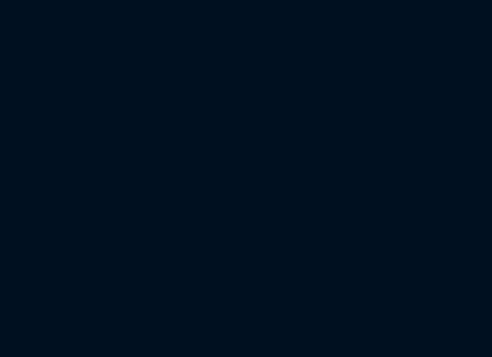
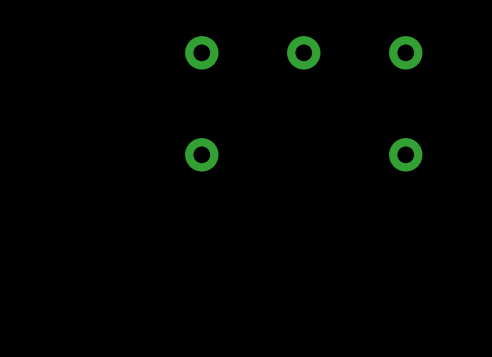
part: none -> (201, 52)
part: none -> (303, 52)
part: none -> (405, 52)
part: none -> (201, 154)
part: none -> (405, 154)

